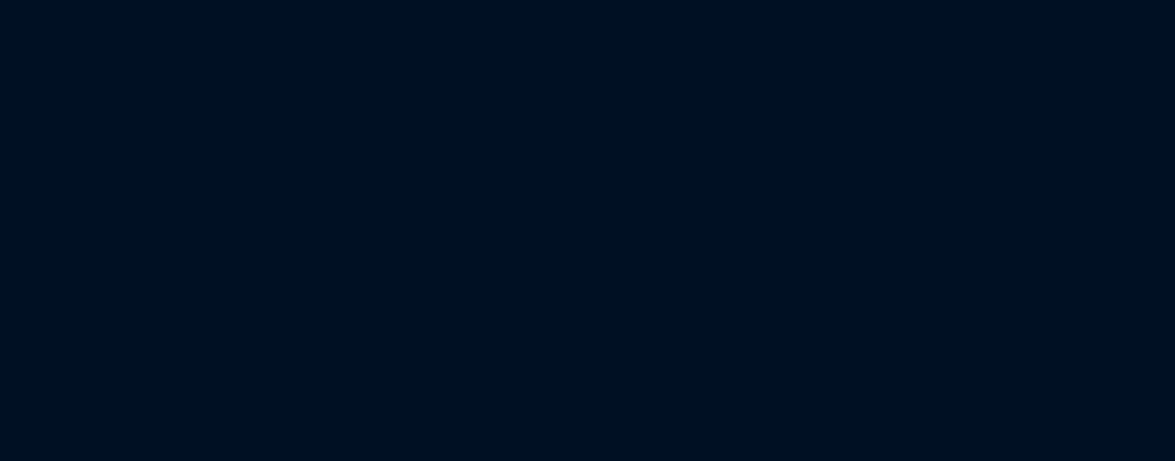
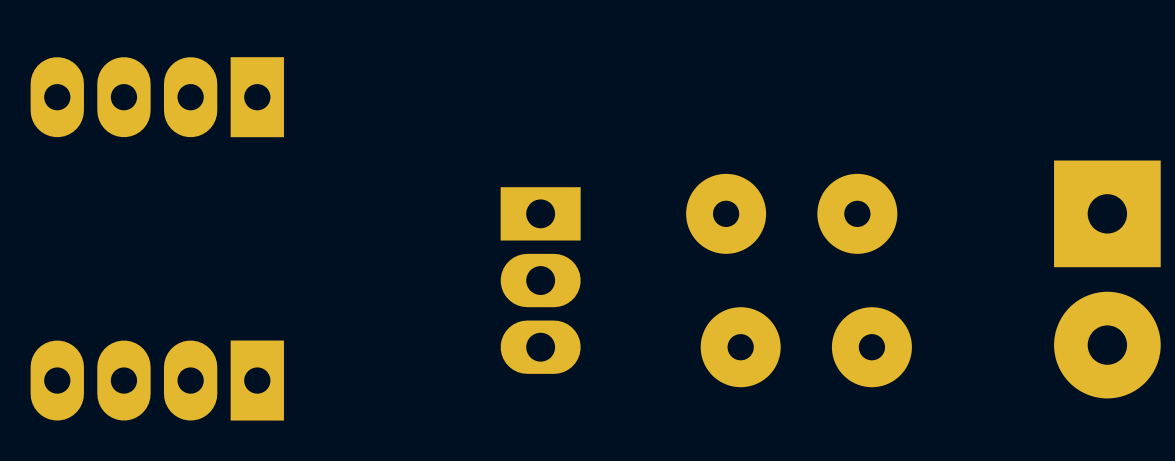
part: none -> (157, 97)
part: none -> (791, 213)
part: none -> (1107, 279)
part: none -> (540, 280)
part: none -> (806, 347)
part: none -> (157, 380)

